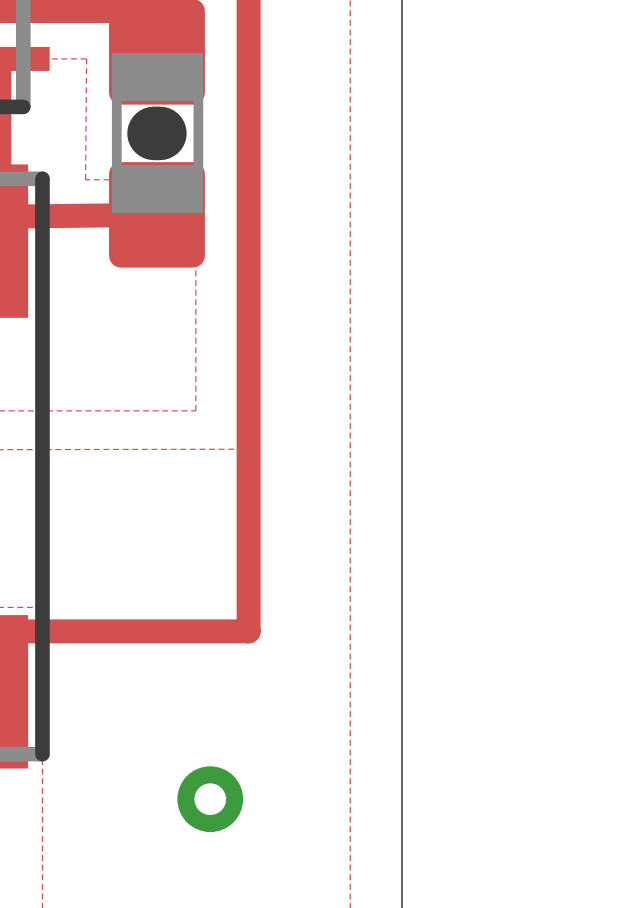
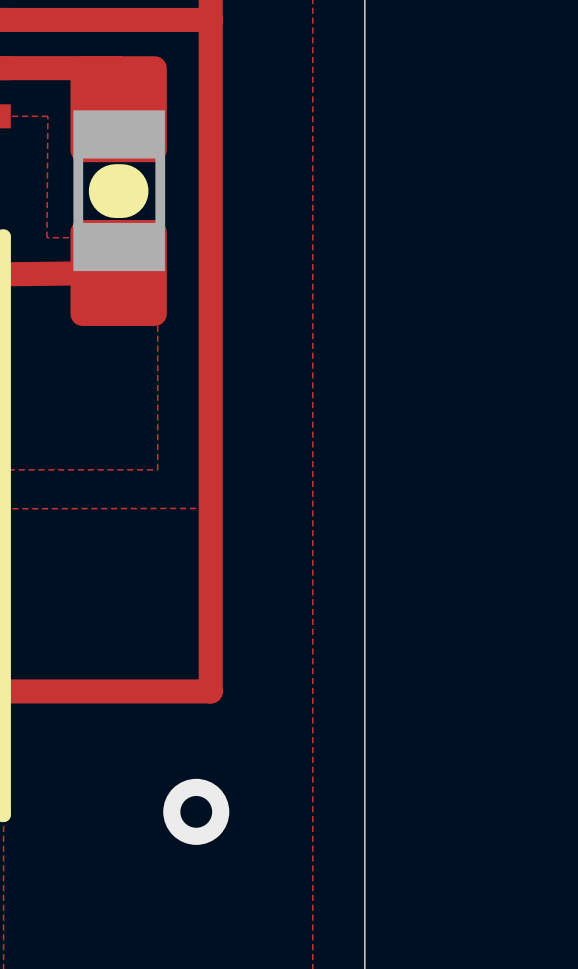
via position: (210, 799) -> (196, 811)

